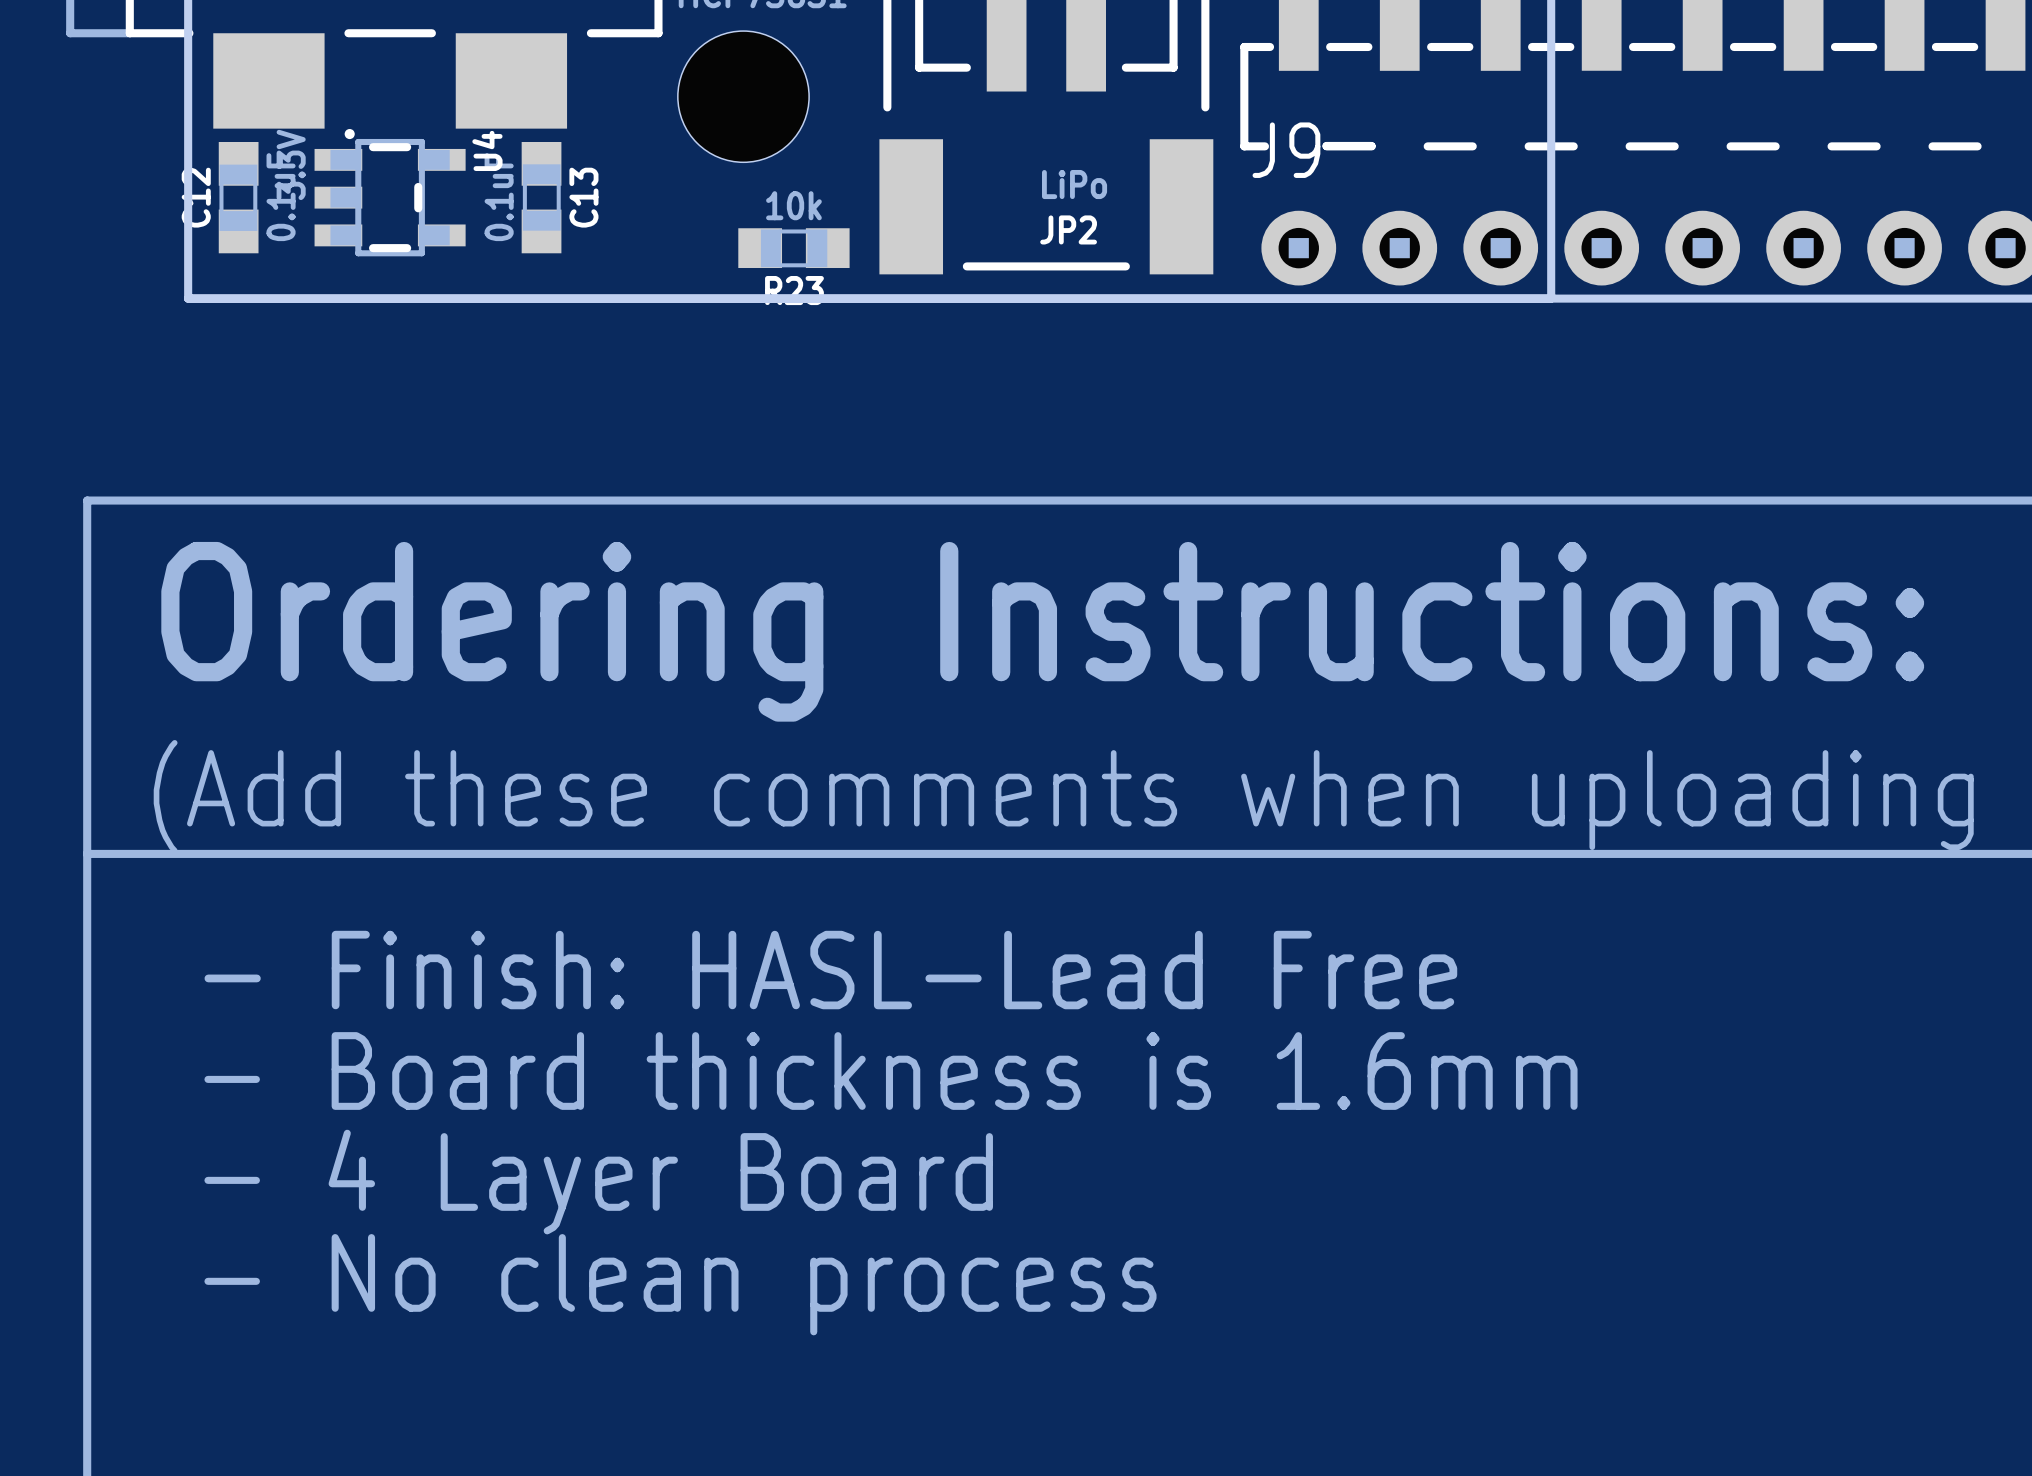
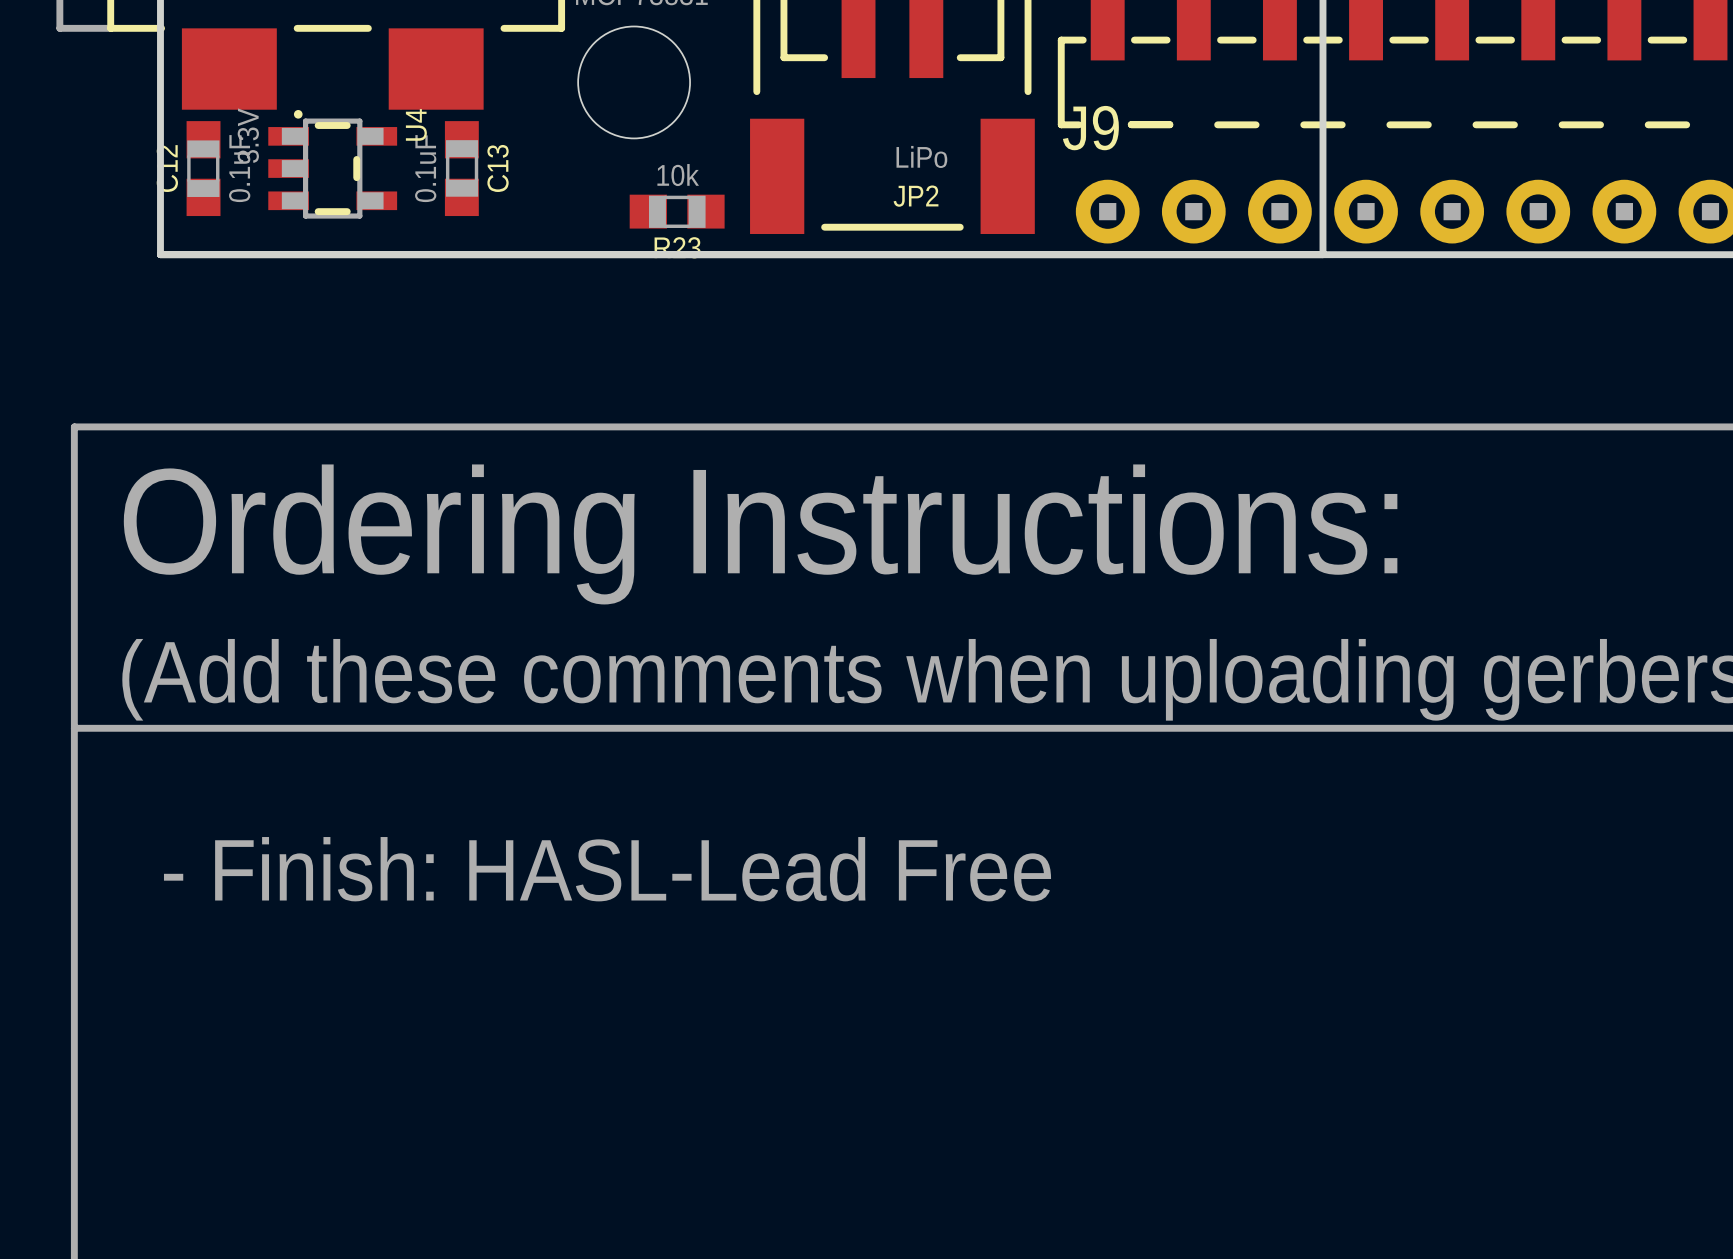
text position: - Finish: HASL-Lead Free (830, 970) -> - Finish: HASL-Lead Free (607, 869)
text: - Board thickness is 1.6mm (890, 1071) -> none
text: - 4 Layer Board (598, 1182) -> none
text: - No clean process (680, 1284) -> none

